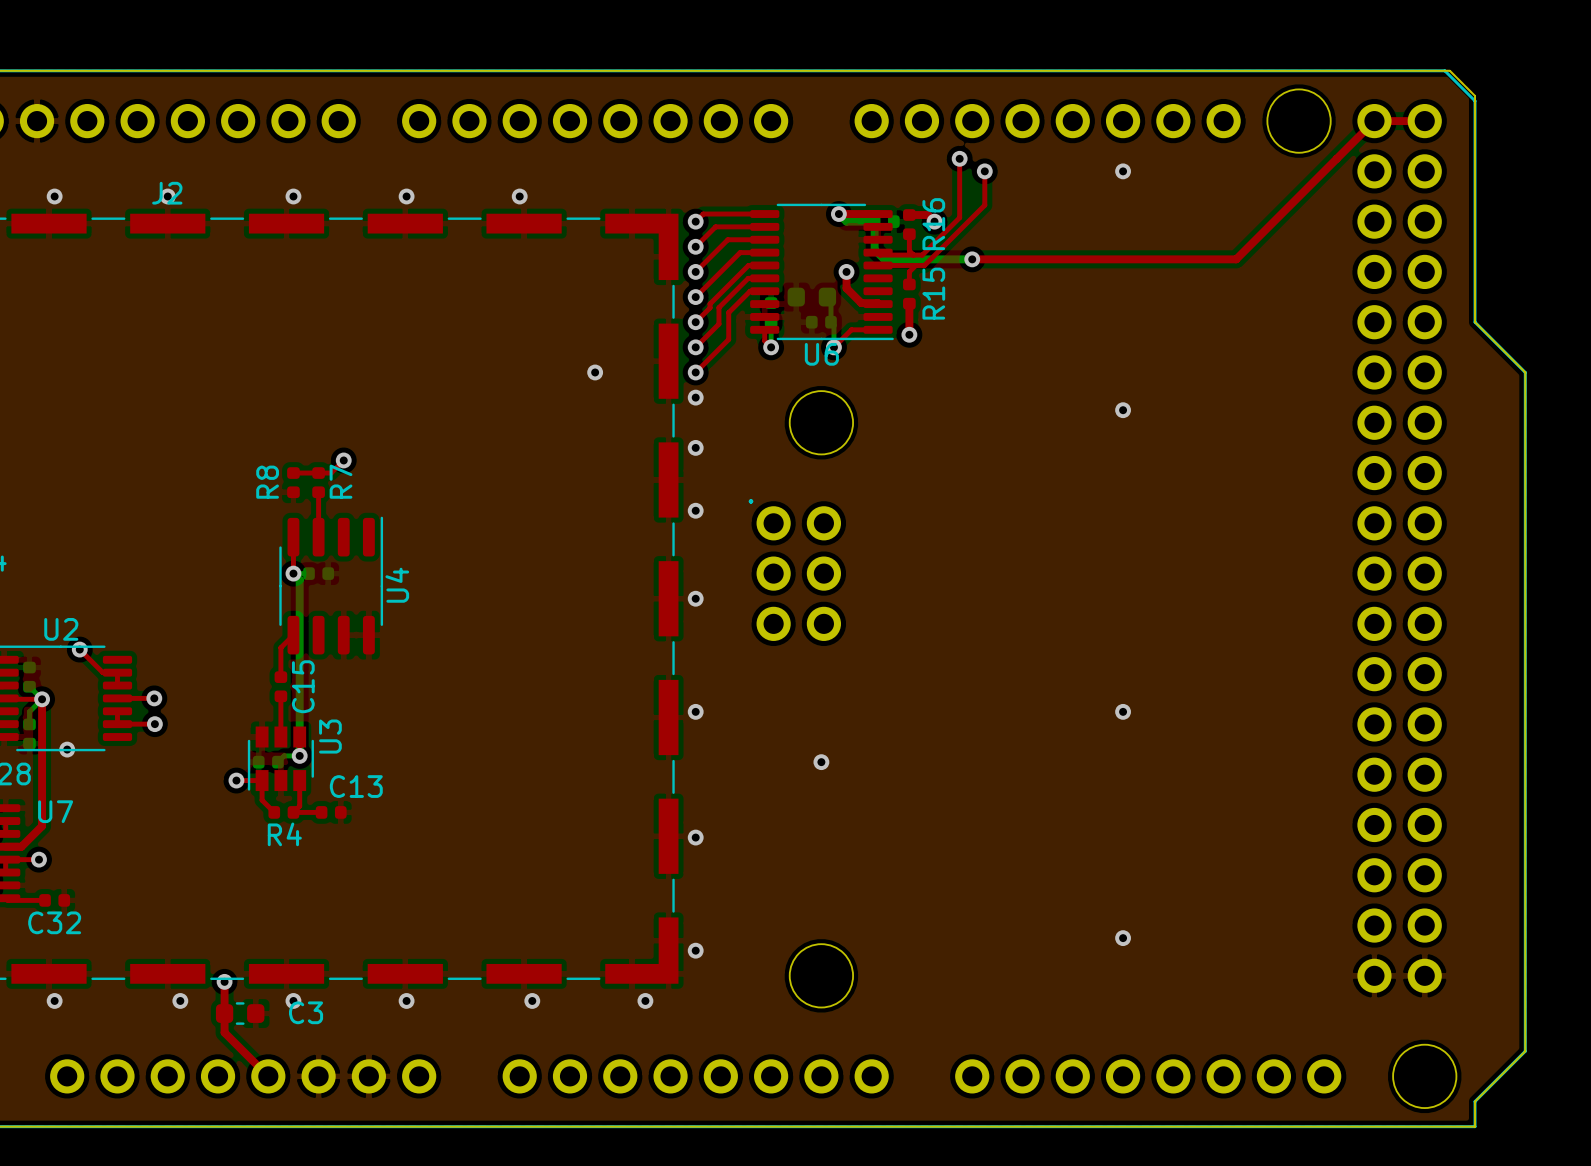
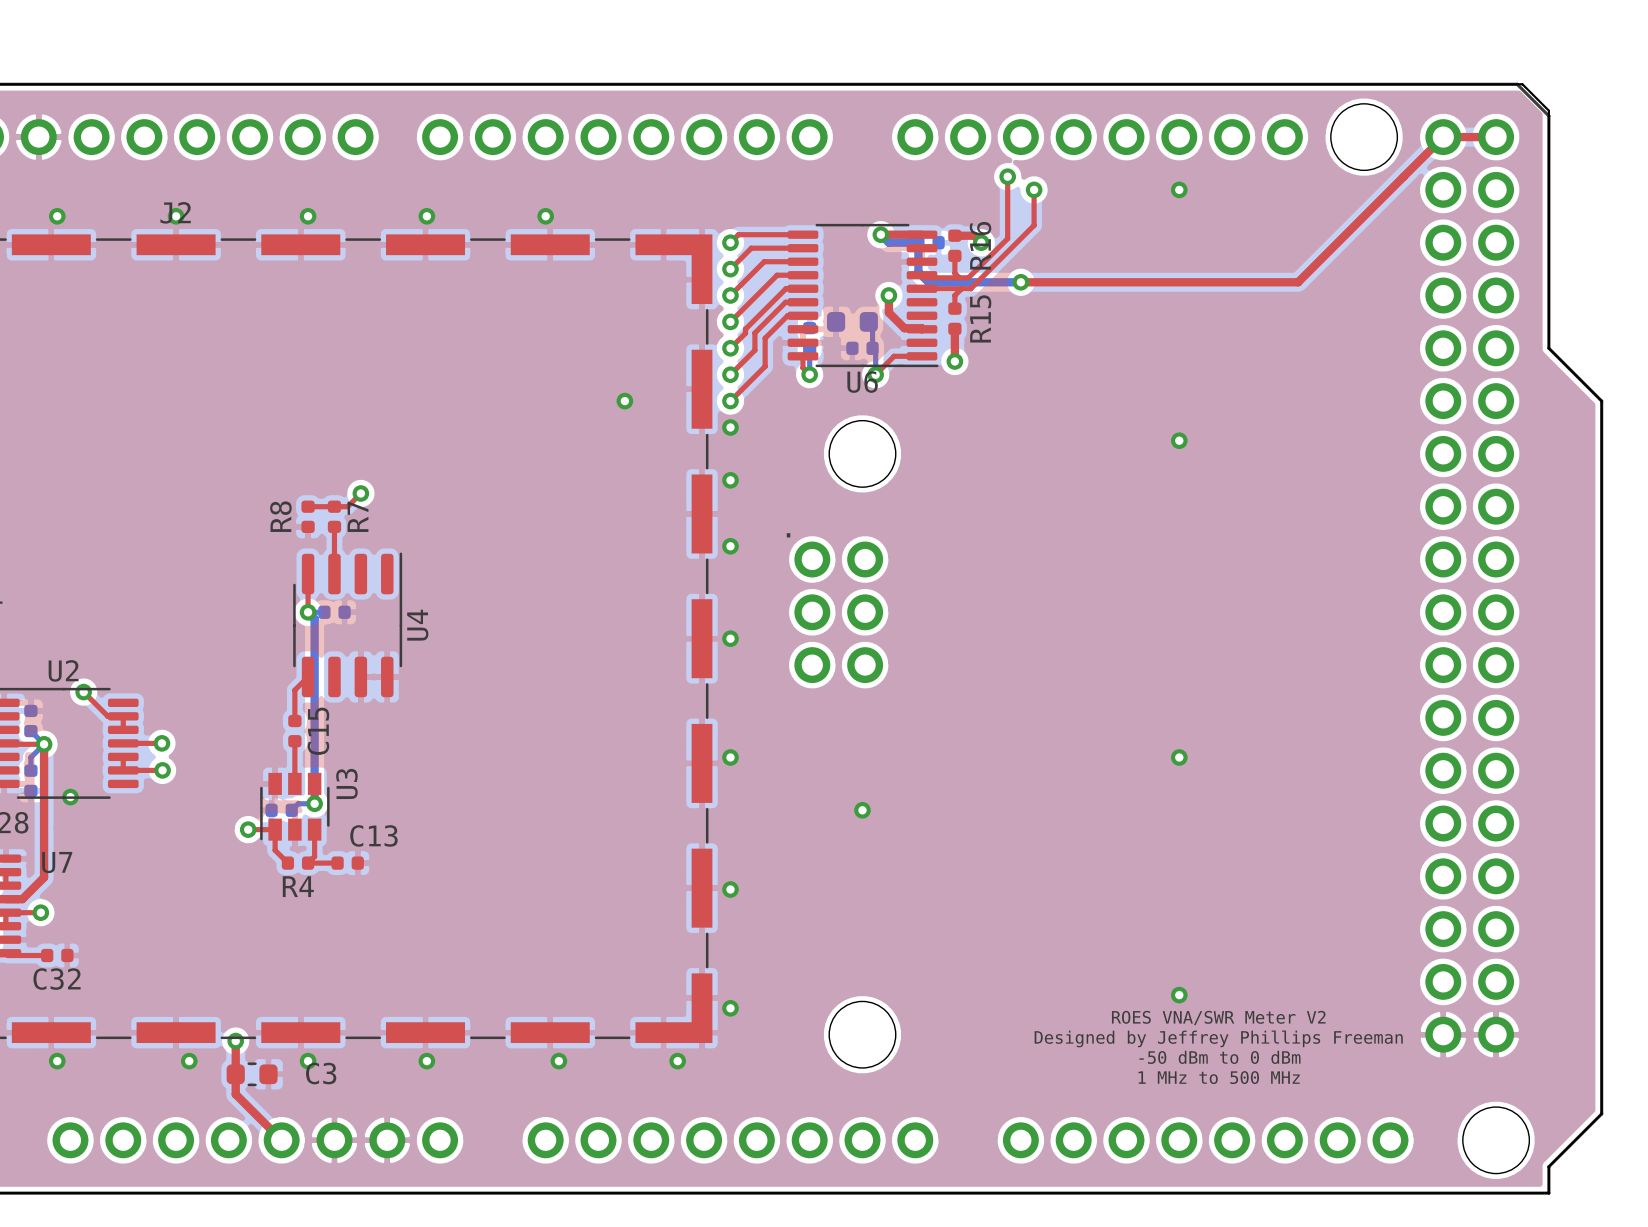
text: none -> ROES VNA/SWR Meter V2 (1218, 1018)
text: none -> Designed by Jeffrey Phillips Freeman (1218, 1038)
text: none -> -50 dBm to 0 dBm (1219, 1057)
text: none -> 1 MHz to 500 MHz (1219, 1077)

